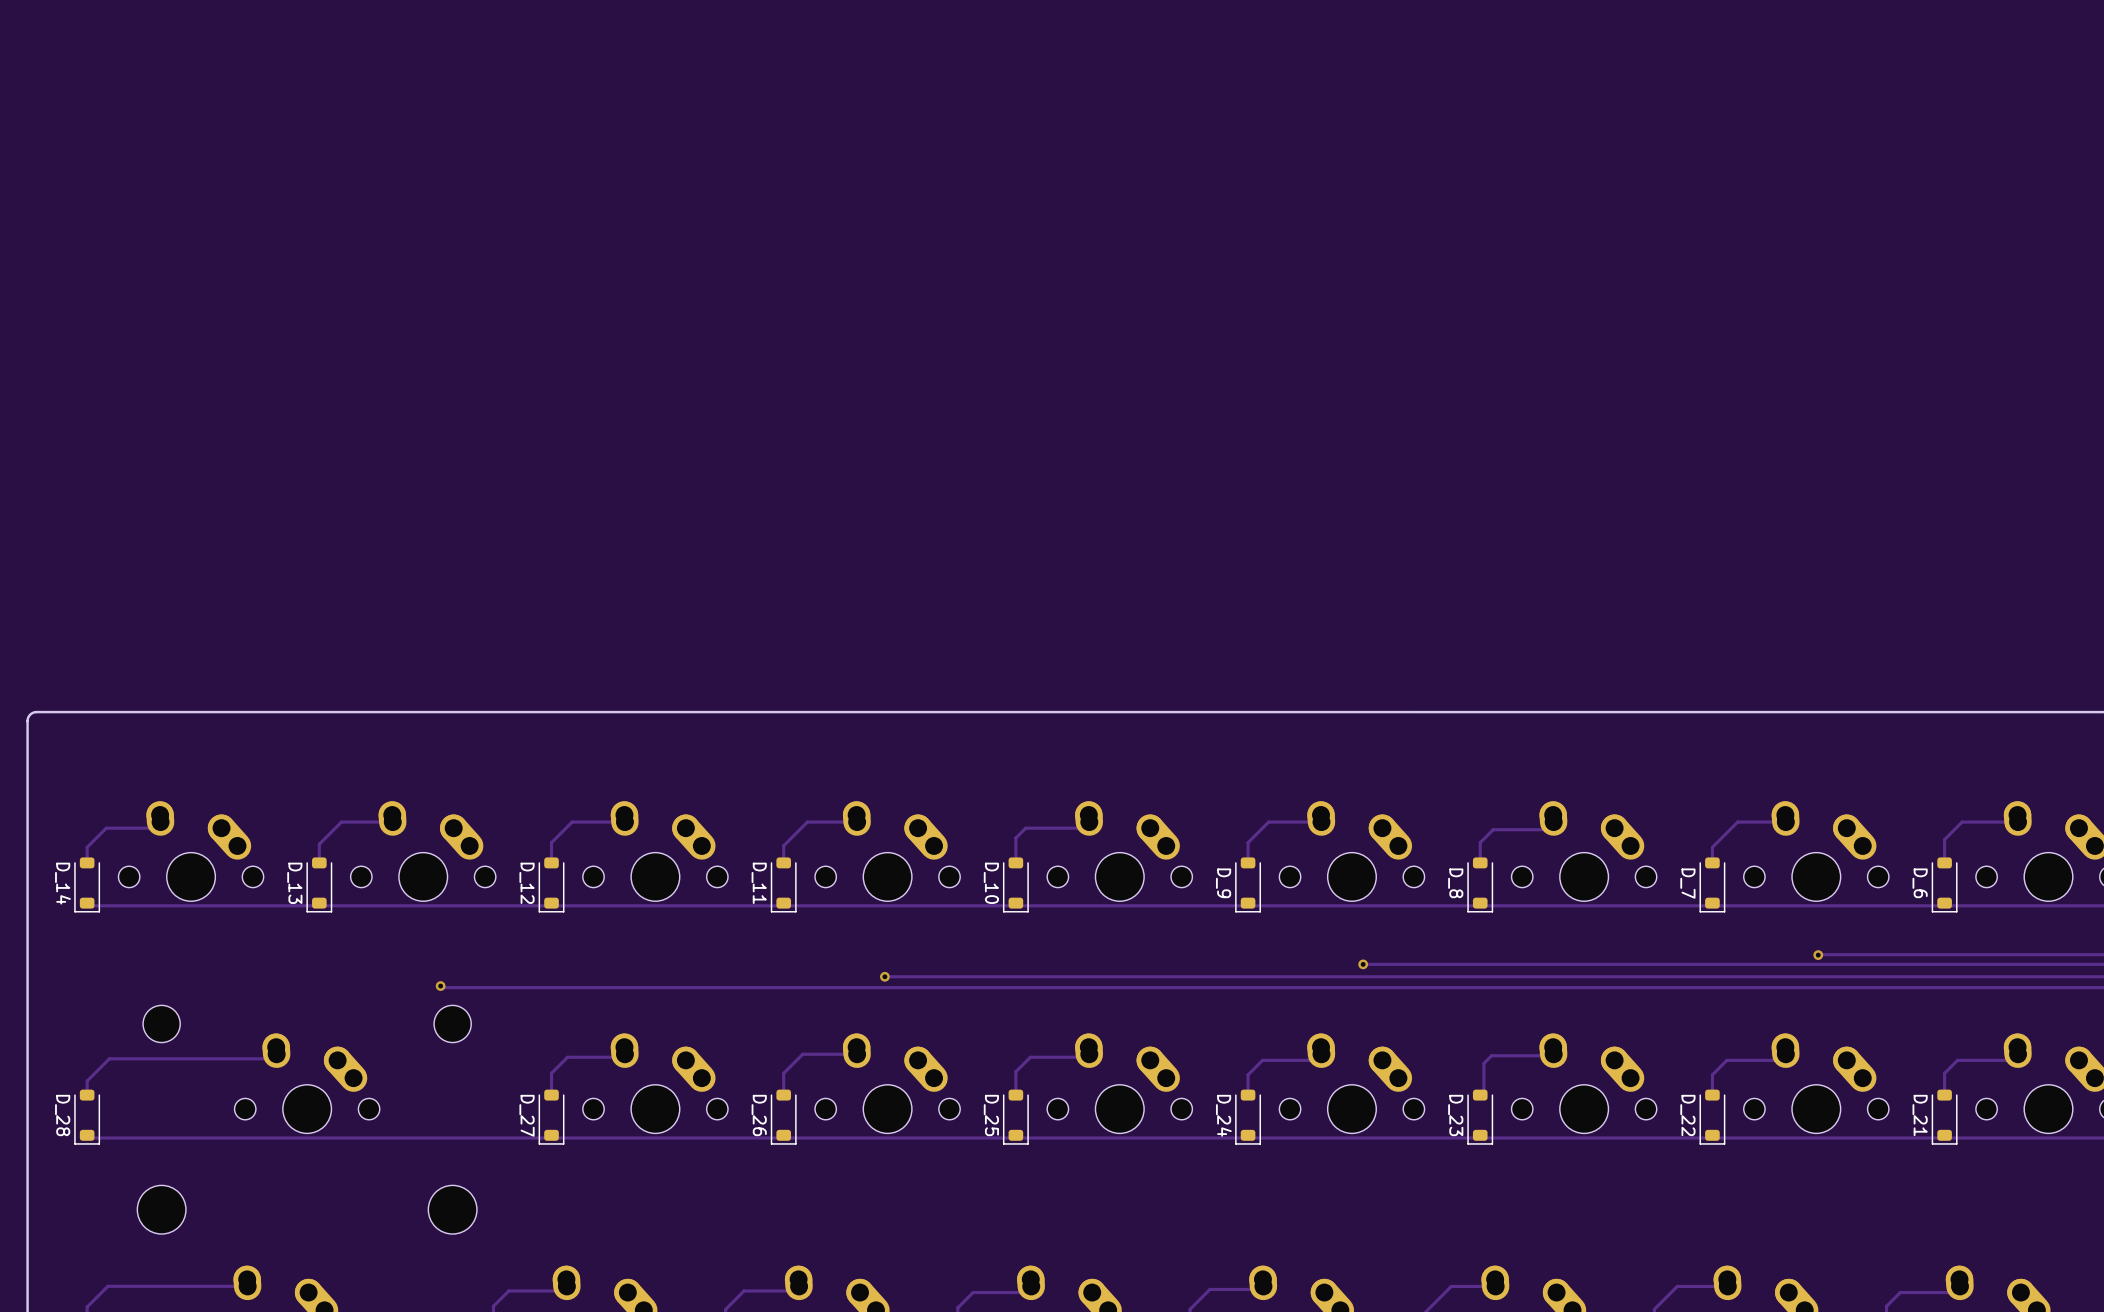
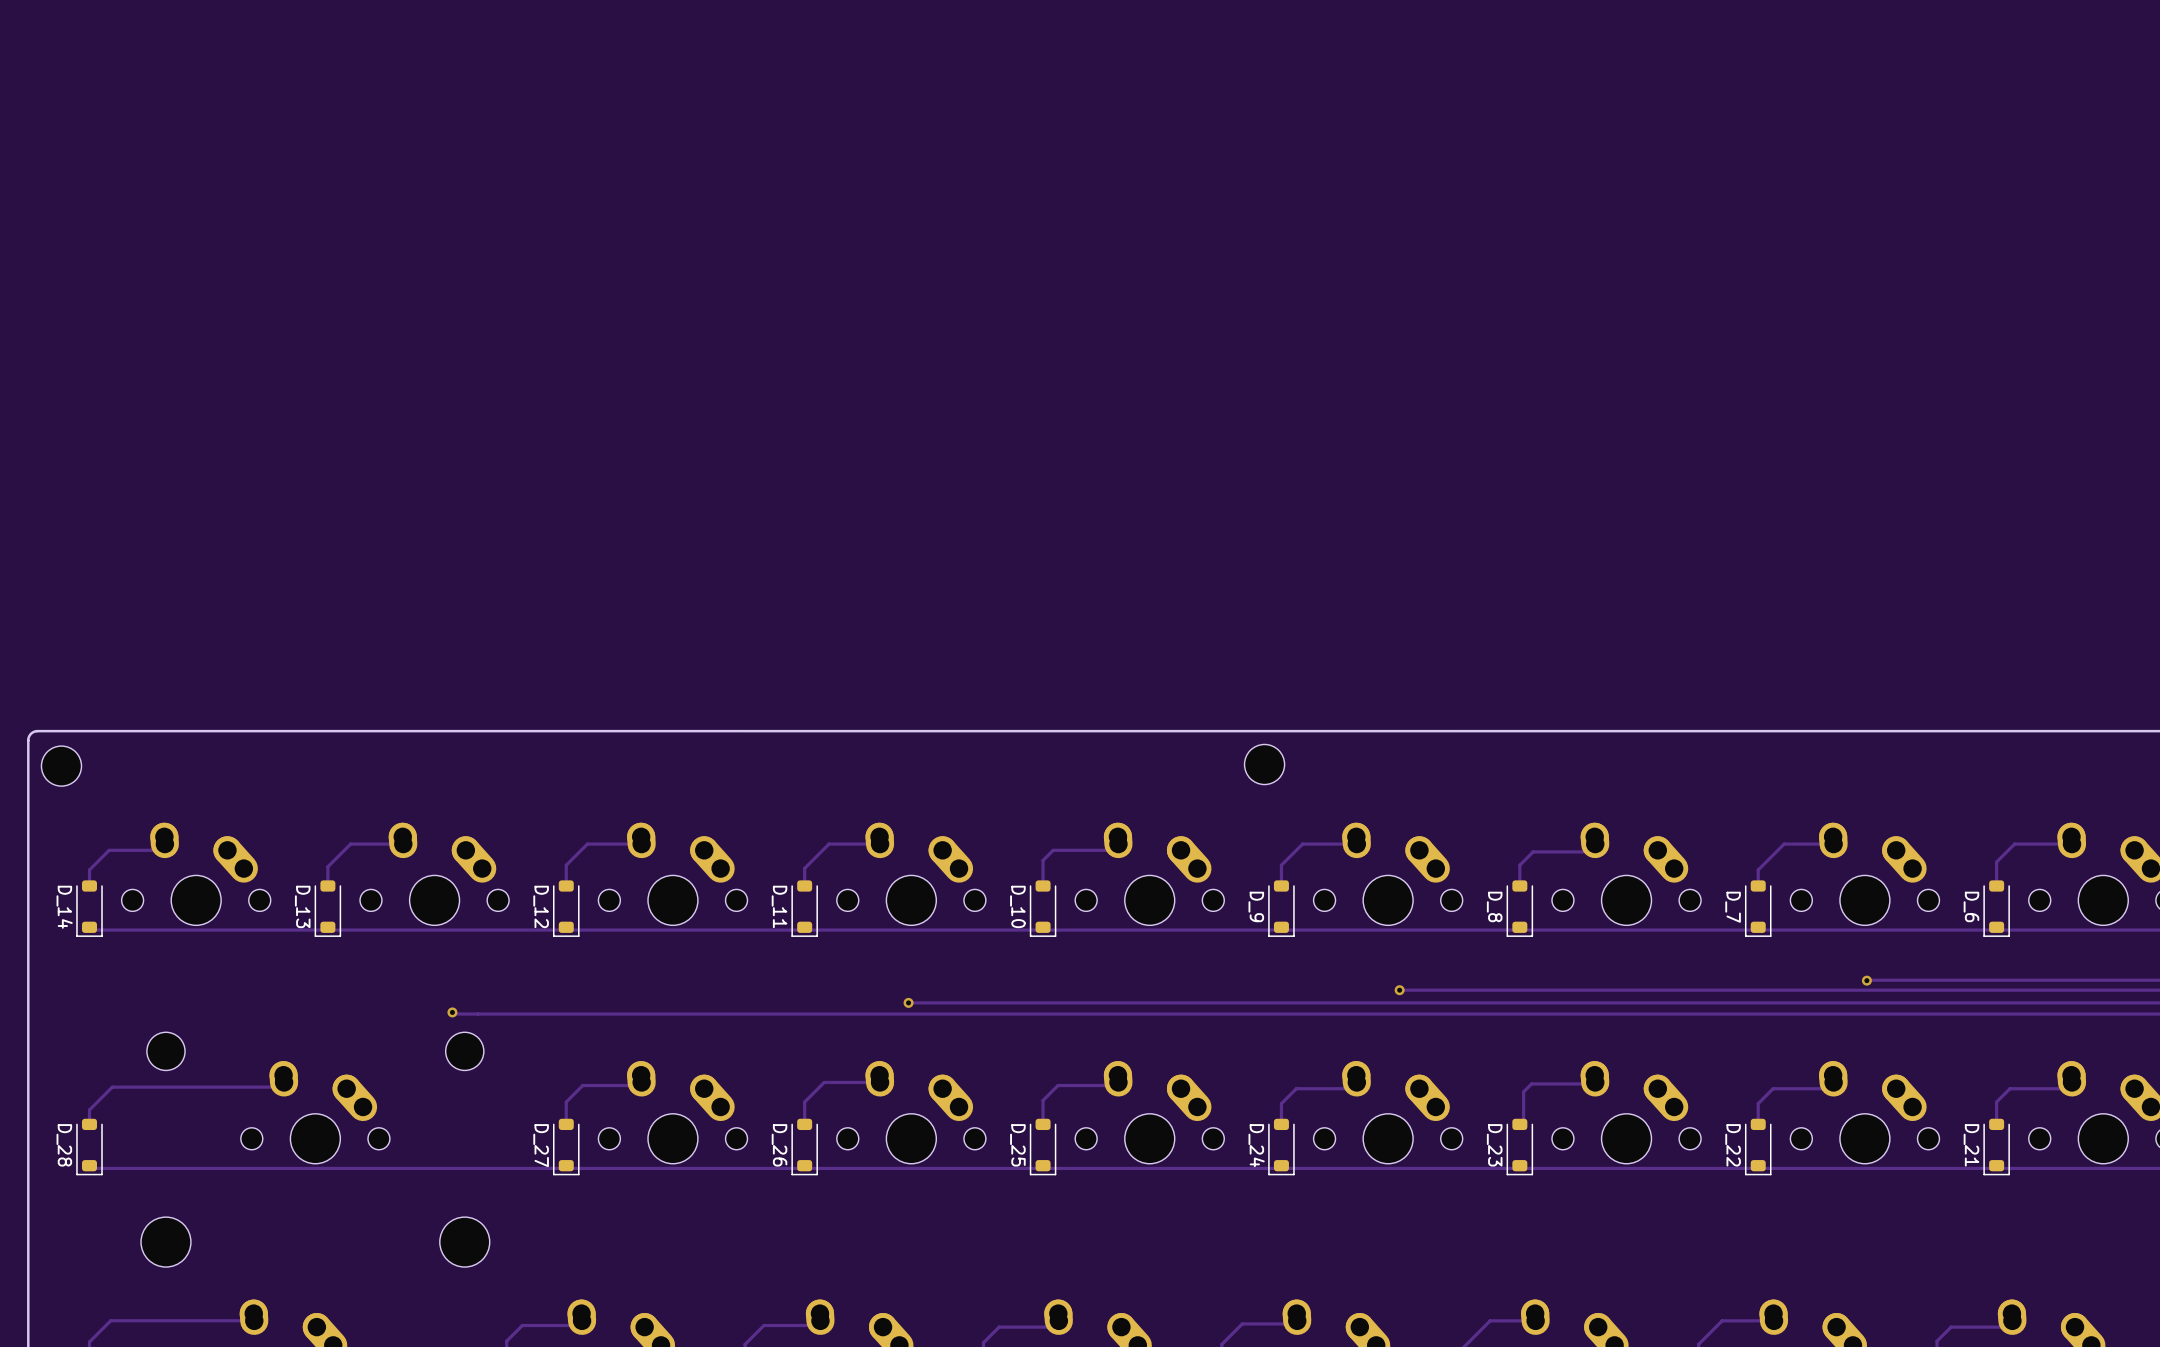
part: none -> (1264, 764)
part: none -> (61, 766)

